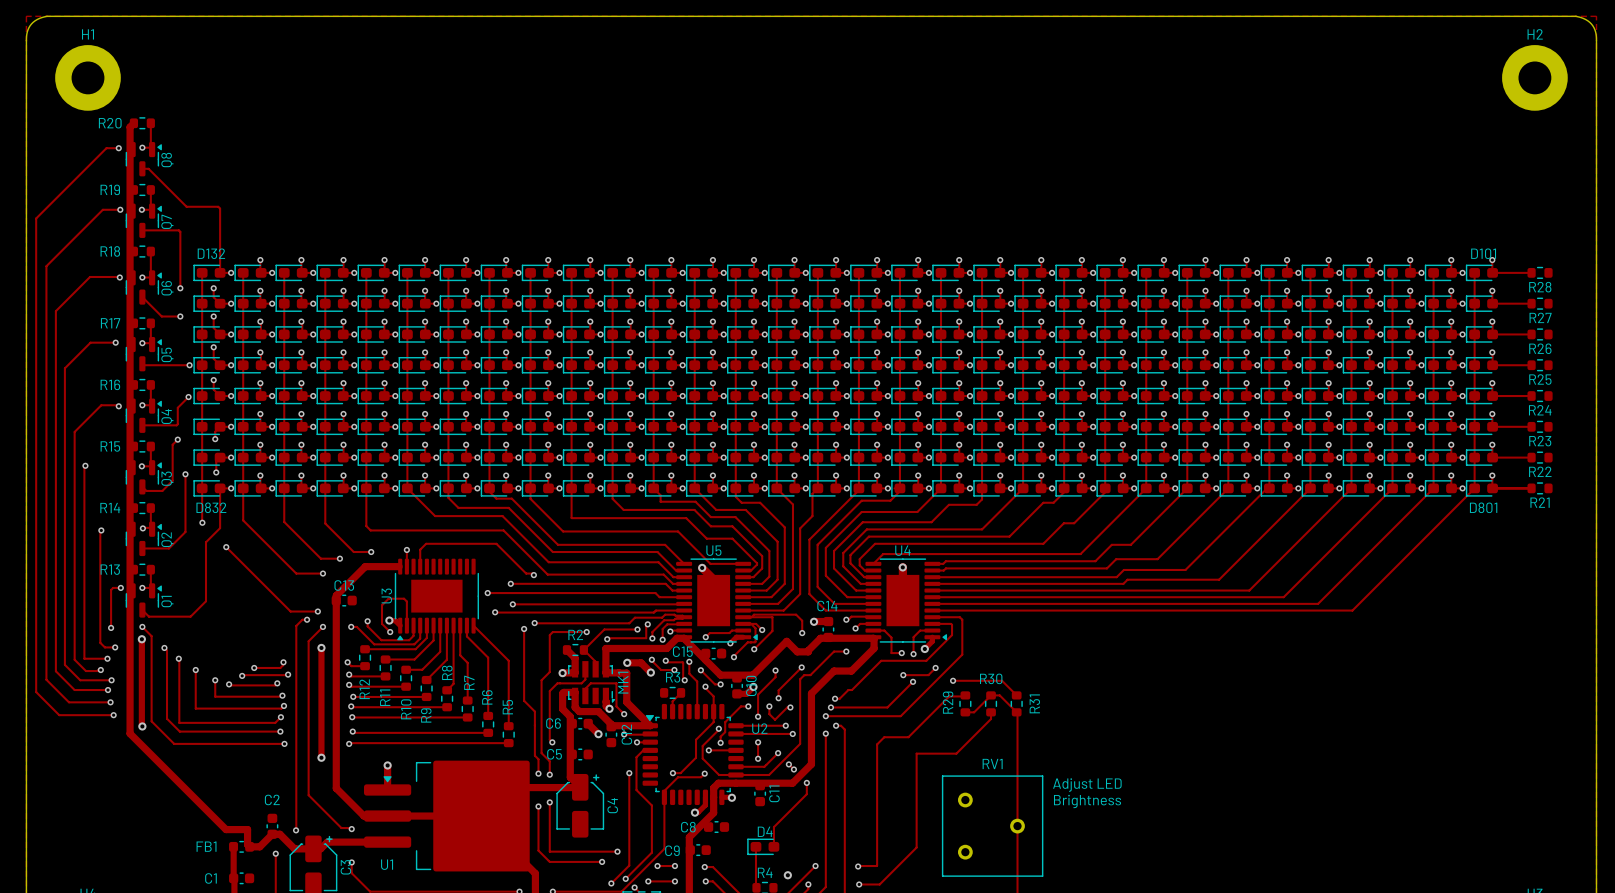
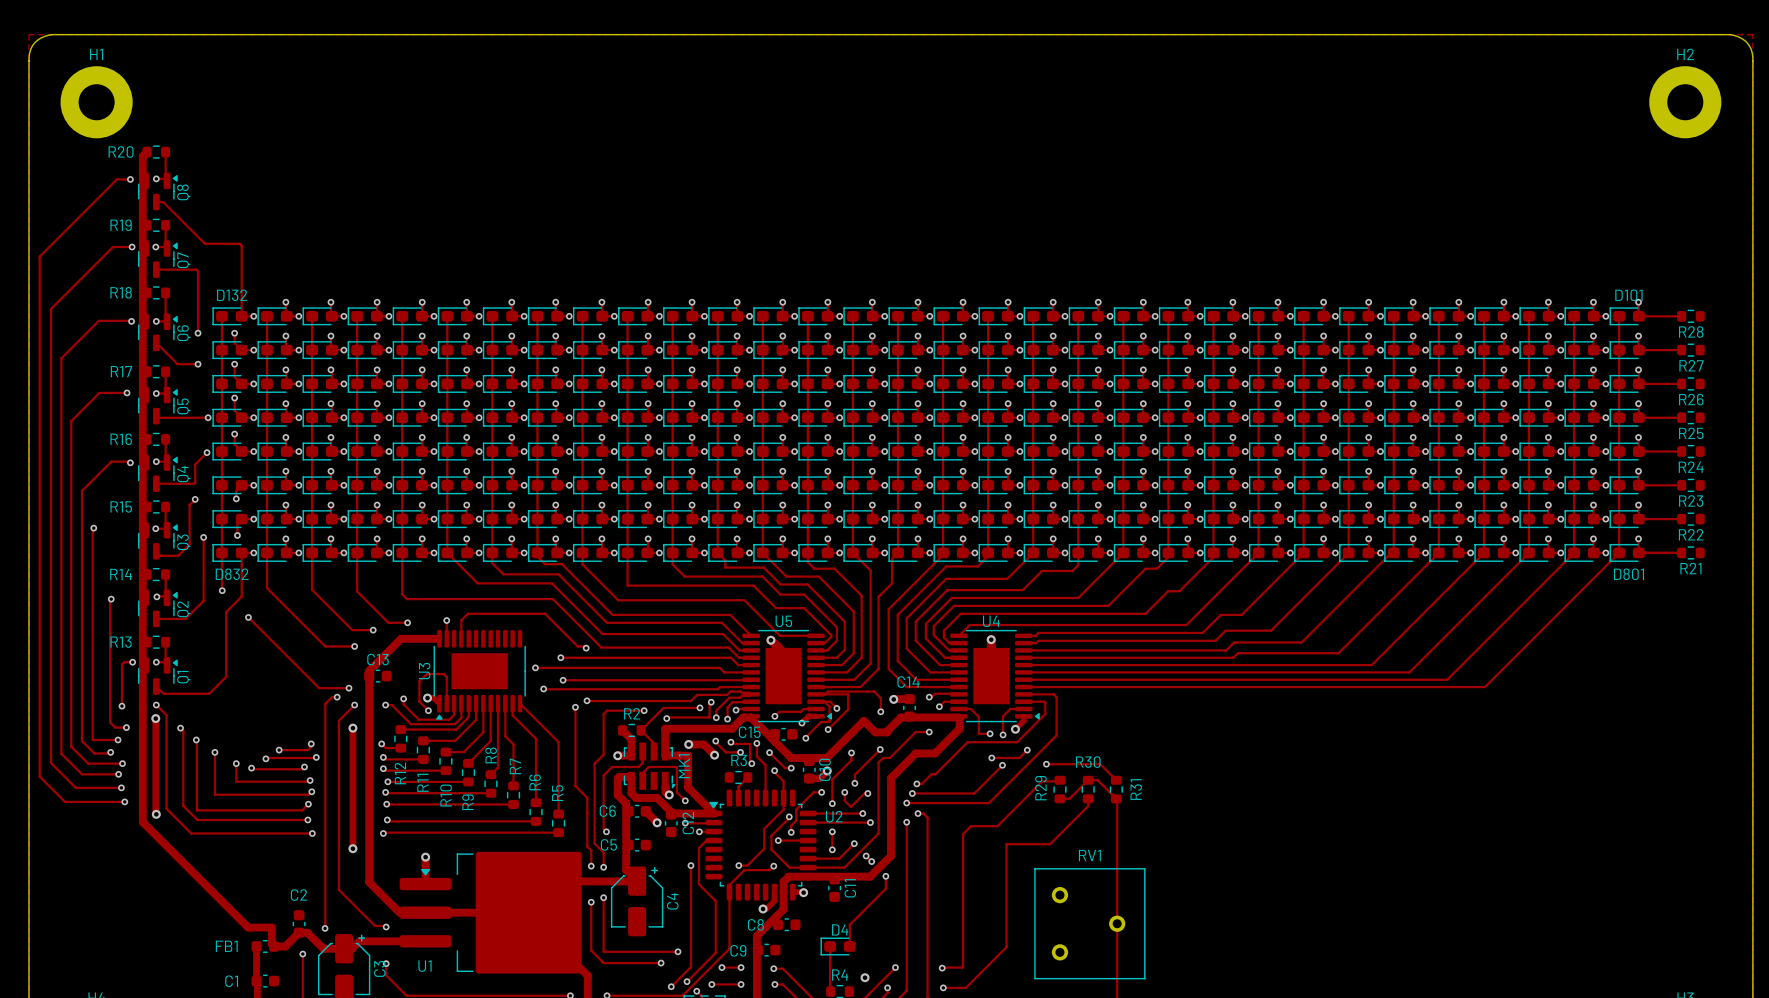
text: Adjust LED (1087, 785) -> none
text: Brightness (1087, 801) -> none

